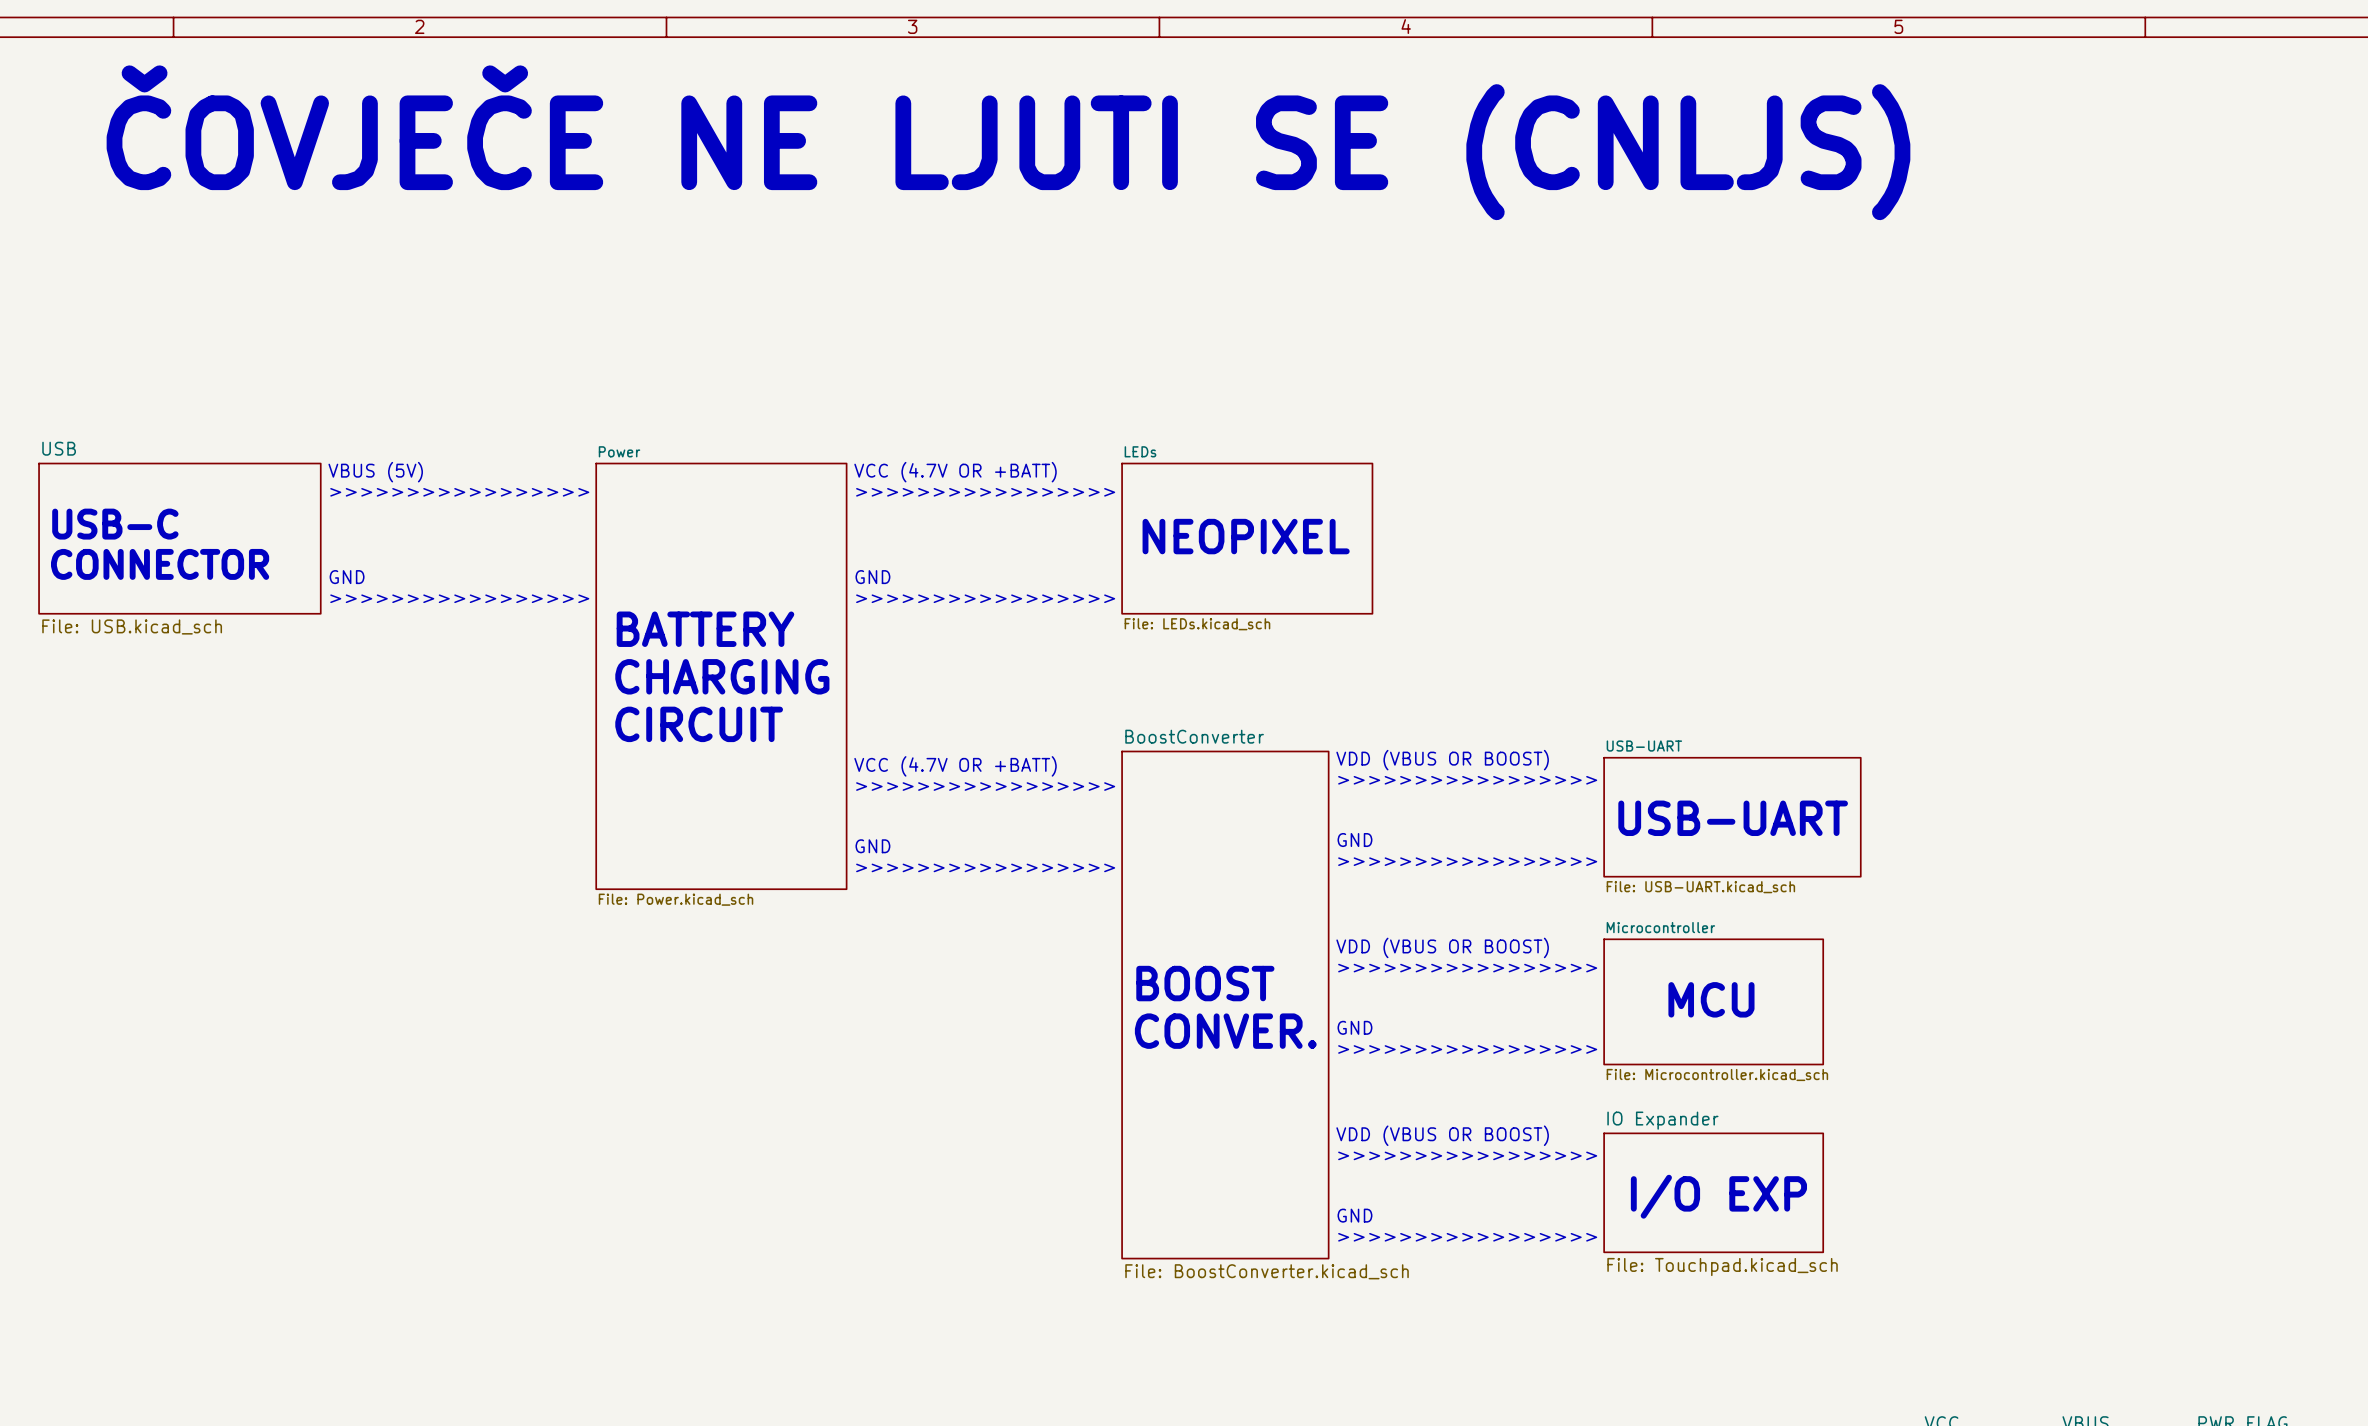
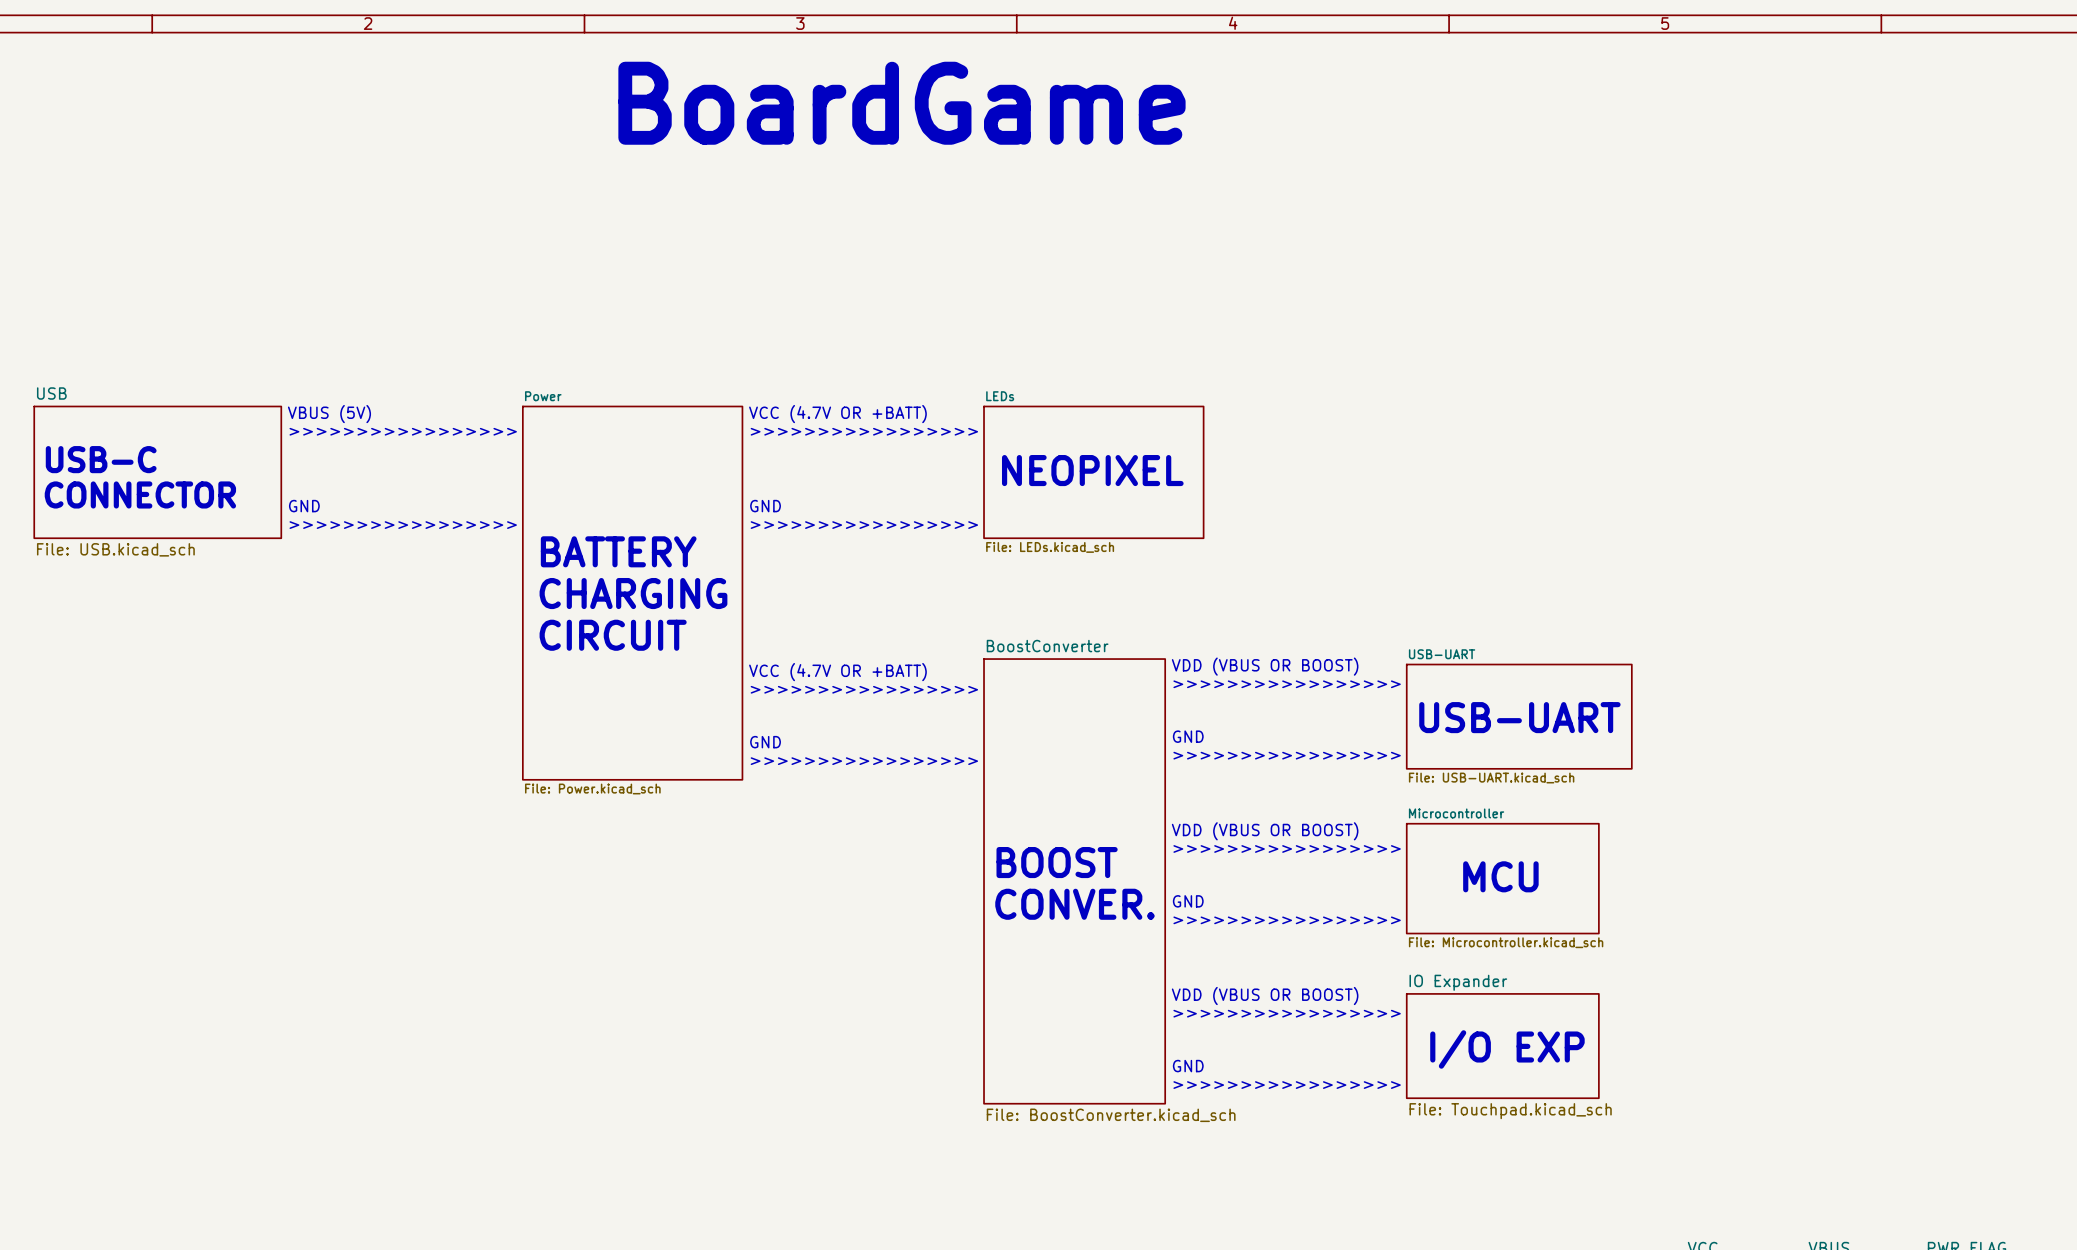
text: none -> BoardGame (901, 103)
text: ČOVJEČE NE LJUTI SE (CNLJS) (1008, 142) -> none

